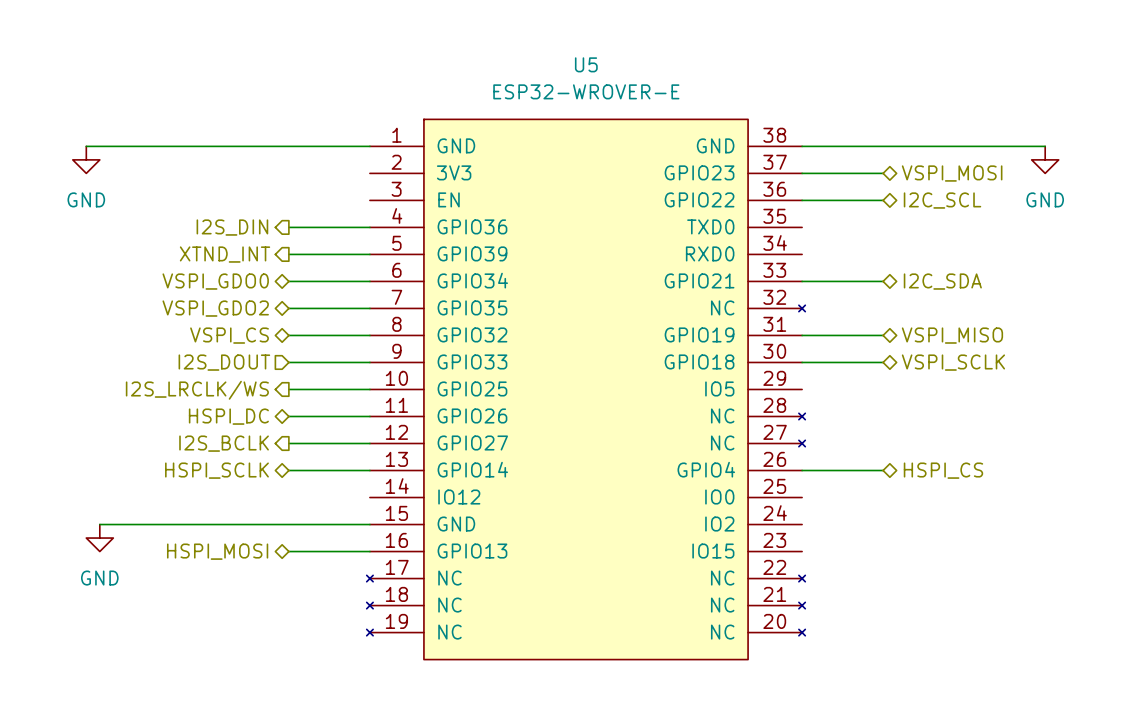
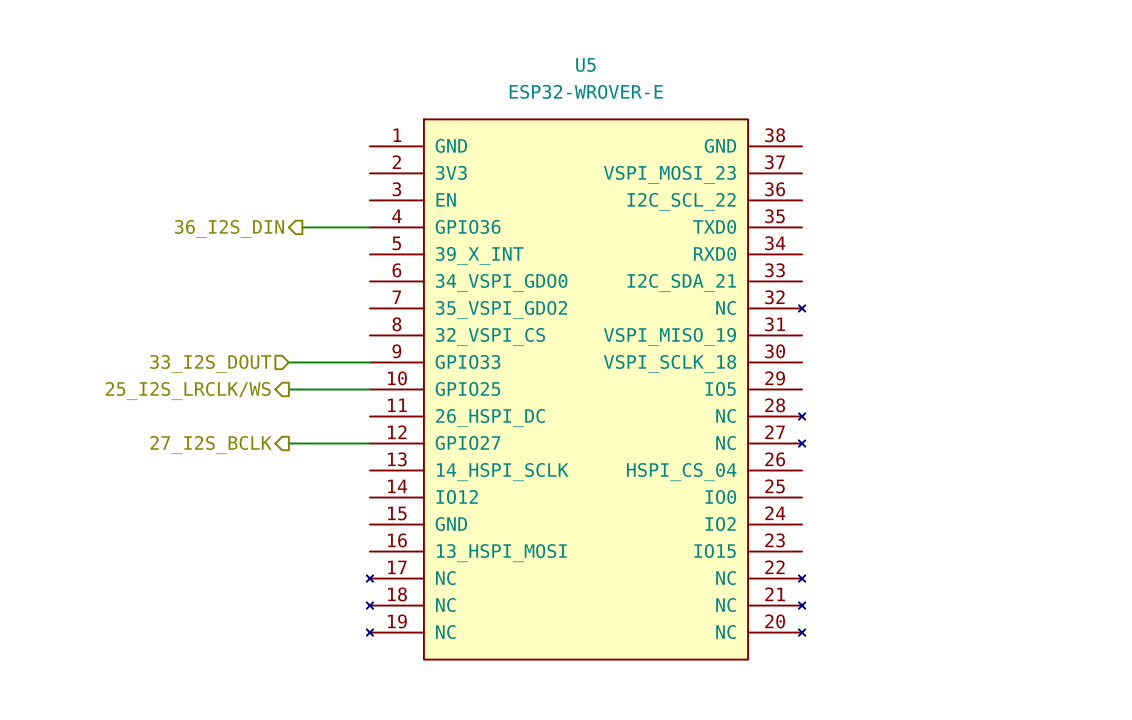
U5 symbol: [366, 119, 806, 660] -> [366, 119, 806, 660]
wire: (86, 146) (369, 146) -> none
wire: (802, 146) (1045, 146) -> none
power symbol: GND (86, 159) -> none
power symbol: GND (1045, 159) -> none
wire: (802, 173) (883, 173) -> none
hierarchical label: VSPI_MOSI (952, 173) -> none
wire: (802, 200) (883, 200) -> none
hierarchical label: I2C_SCL (942, 200) -> none
hierarchical label: I2S_DIN (232, 227) -> 36_I2S_DIN (229, 228)
wire: (288, 227) (302, 227) -> none
hierarchical label: XTND_INT (225, 254) -> none
wire: (288, 254) (369, 254) -> none
hierarchical label: VSPI_GDO0 (215, 281) -> none
wire: (288, 281) (369, 281) -> none
wire: (802, 281) (883, 281) -> none
hierarchical label: I2C_SDA (942, 281) -> none
hierarchical label: VSPI_GDO2 (215, 308) -> none
wire: (288, 308) (369, 308) -> none
hierarchical label: VSPI_CS (229, 335) -> none
wire: (288, 335) (369, 335) -> none
wire: (802, 335) (883, 335) -> none
hierarchical label: VSPI_MISO (952, 335) -> none
hierarchical label: I2S_DOUT (224, 362) -> 33_I2S_DOUT (210, 364)
wire: (802, 362) (883, 362) -> none
hierarchical label: VSPI_SCLK (953, 362) -> none
hierarchical label: I2S_LRCLK/WS (197, 390) -> 25_I2S_LRCLK/WS (188, 391)
hierarchical label: HSPI_DC (228, 416) -> none
wire: (288, 416) (369, 416) -> none
hierarchical label: I2S_BCLK (224, 443) -> 27_I2S_BCLK (211, 445)
hierarchical label: HSPI_SCLK (216, 470) -> none
wire: (288, 470) (369, 470) -> none
wire: (802, 470) (883, 470) -> none
hierarchical label: HSPI_CS (943, 470) -> none
wire: (99, 524) (369, 524) -> none
power symbol: GND (99, 538) -> none
hierarchical label: HSPI_MOSI (217, 551) -> none
wire: (288, 551) (369, 551) -> none

